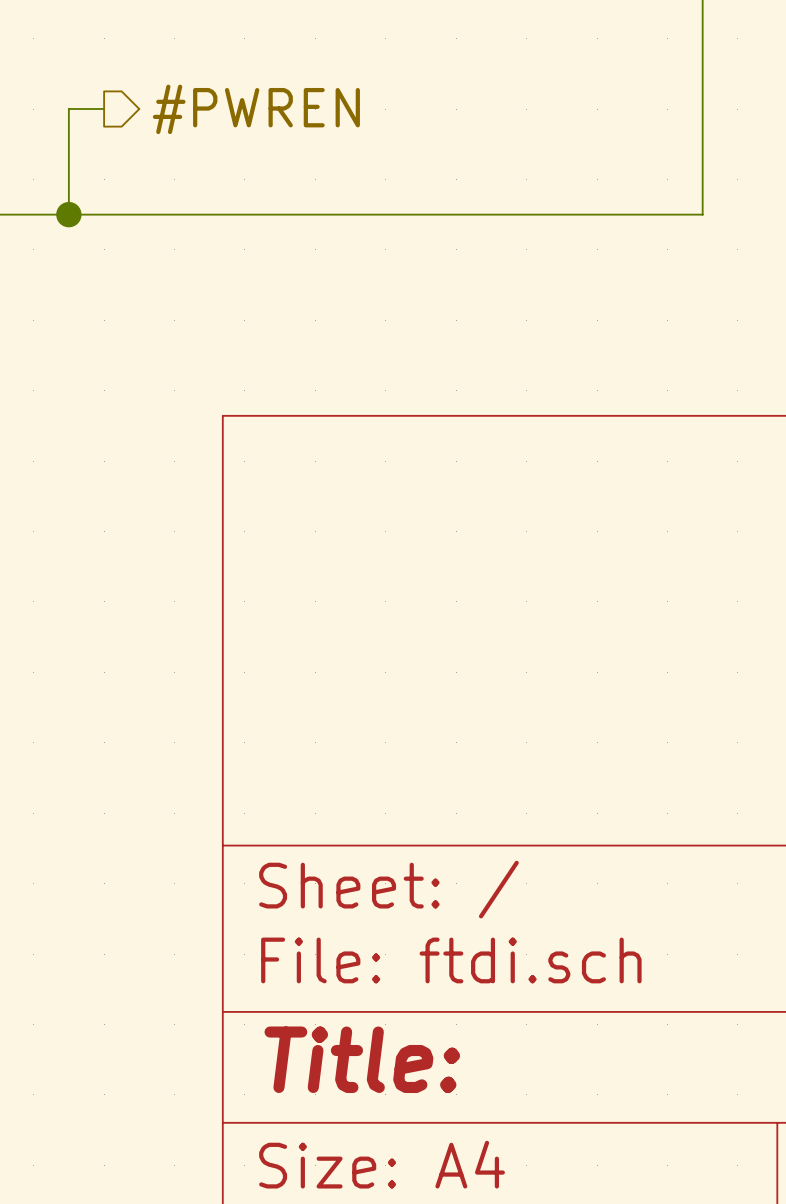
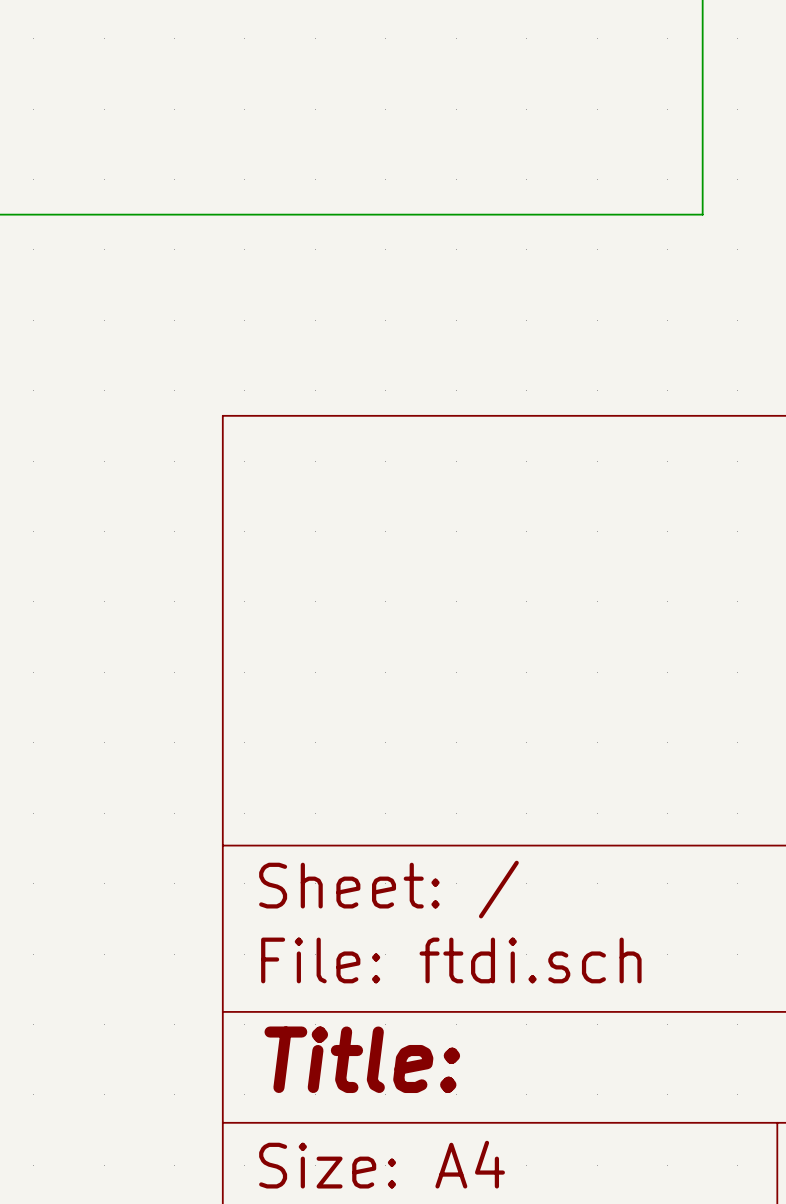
wire: (104, 109) (68, 109) (68, 214) -> none
hierarchical label: #PWREN (256, 109) -> none
junction: (68, 214) -> none

